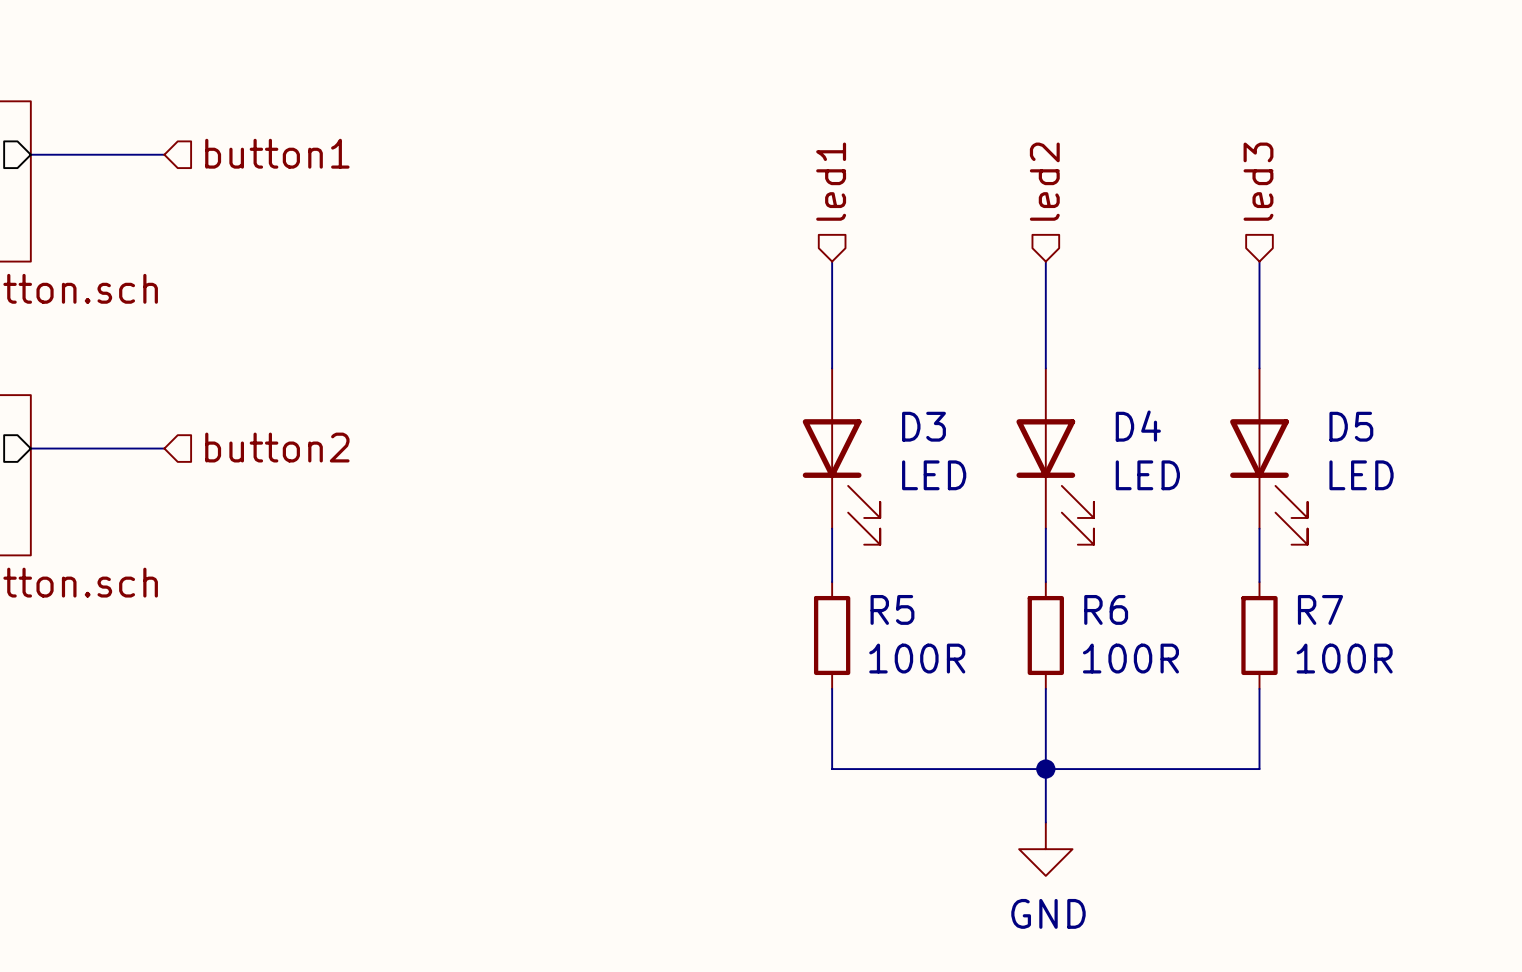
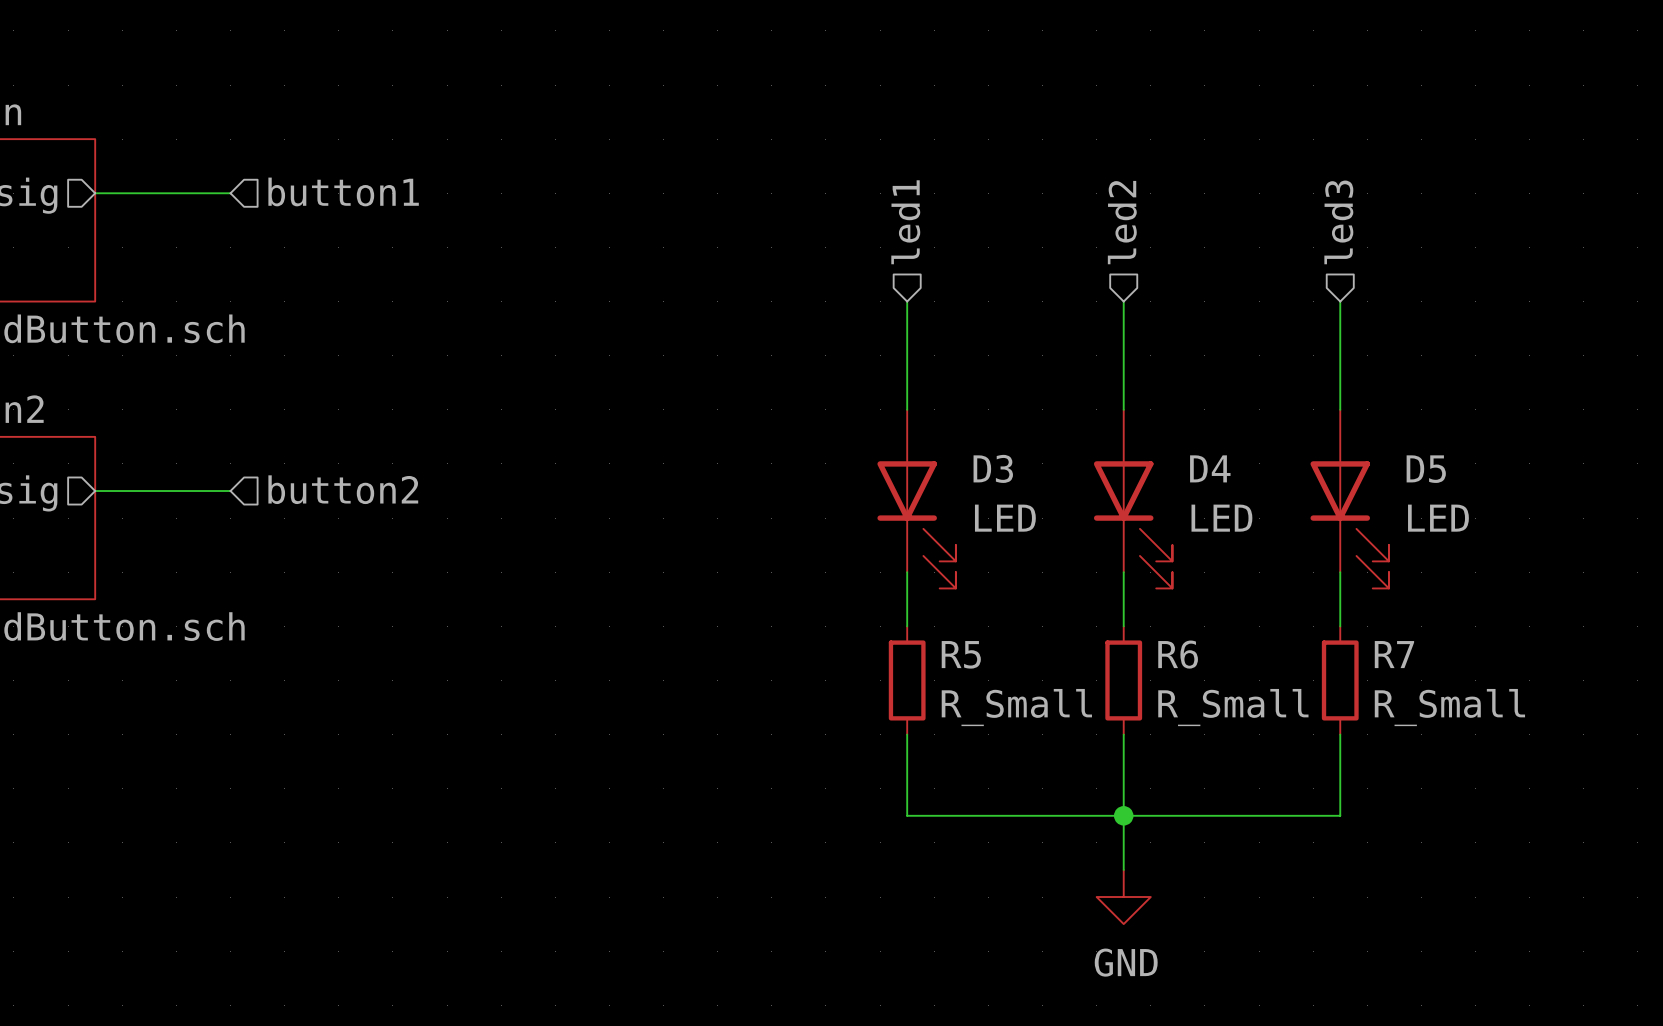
R5 value: 100R (917, 658) -> R_Small (1016, 707)
R6 value: 100R (1130, 658) -> R_Small (1233, 707)
R7 value: 100R (1344, 658) -> R_Small (1449, 707)

